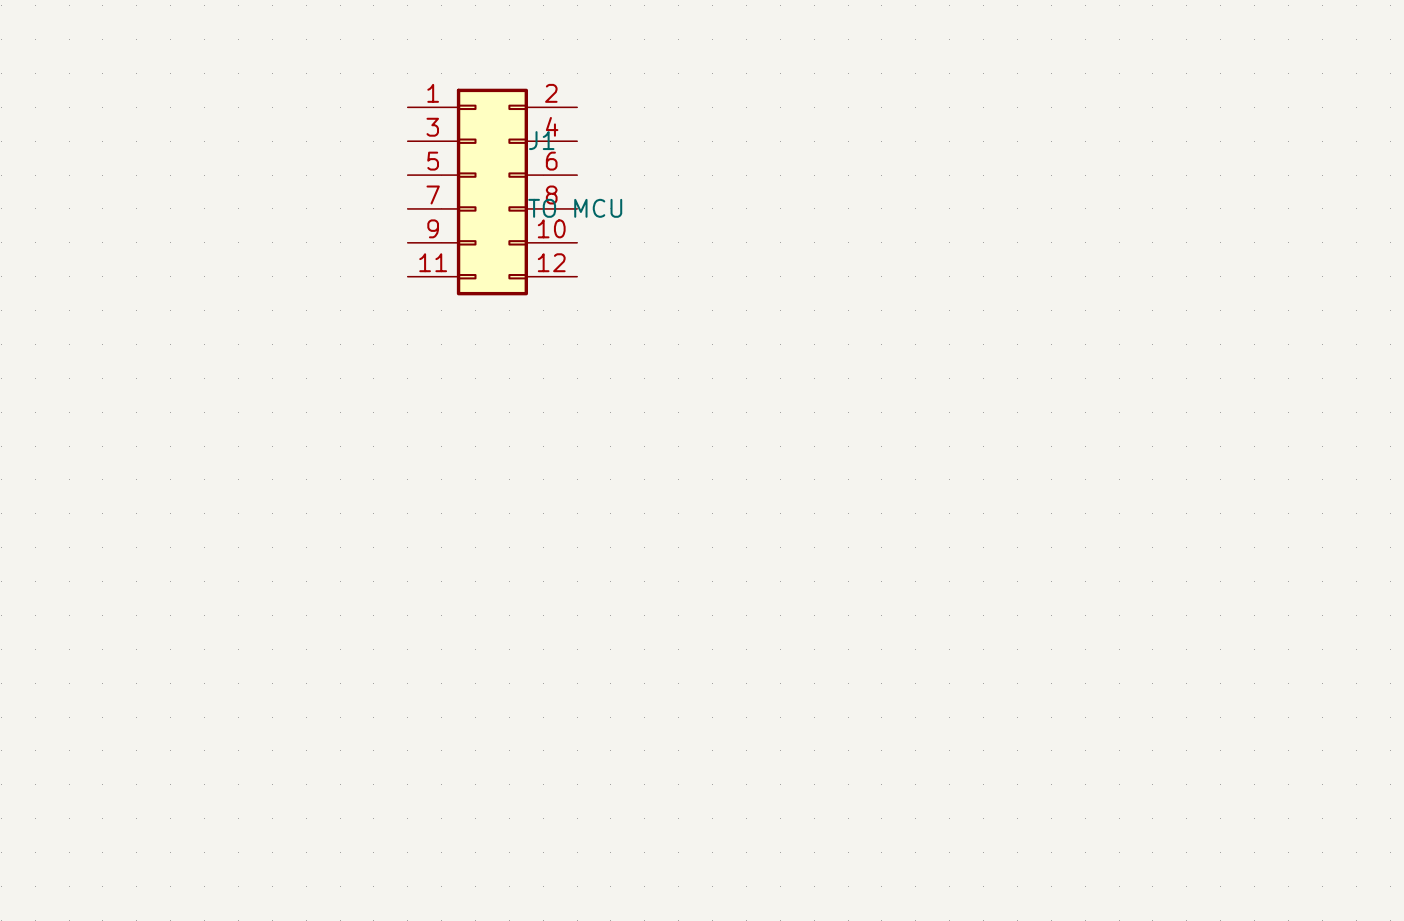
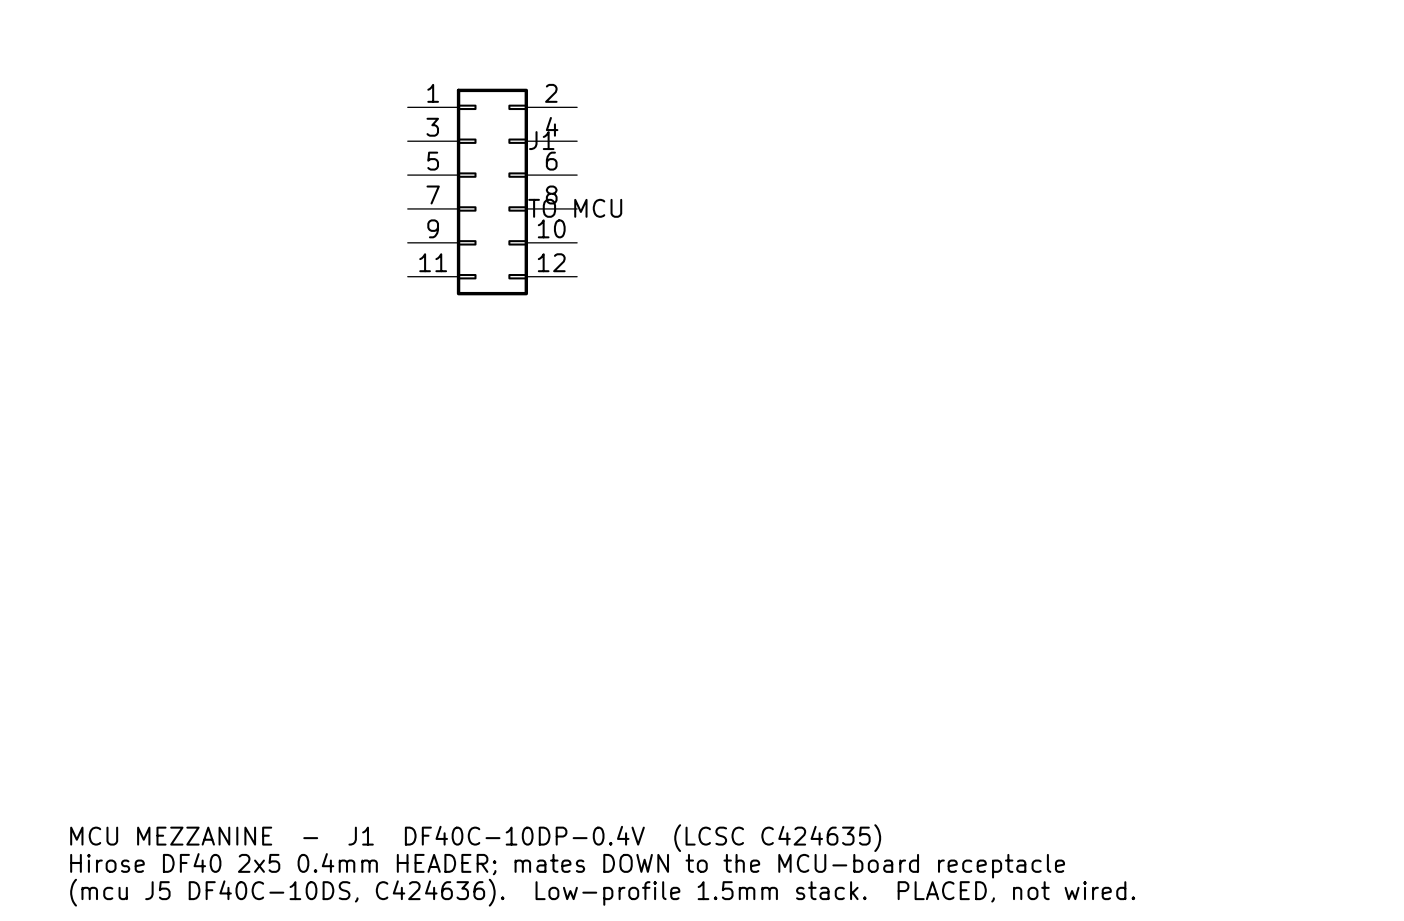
text: none -> MCU MEZZANINE - J1 DF40C-10DP-0.4V (LCSC C424635) (475, 838)
text: none -> Hirose DF40 2x5 0.4mm HEADER; mates DOWN to the MCU-board receptacle (567, 865)
text: none -> (mcu J5 DF40C-10DS, C424636). Low-profile 1.5mm stack. PLACED, not wired. (602, 892)

